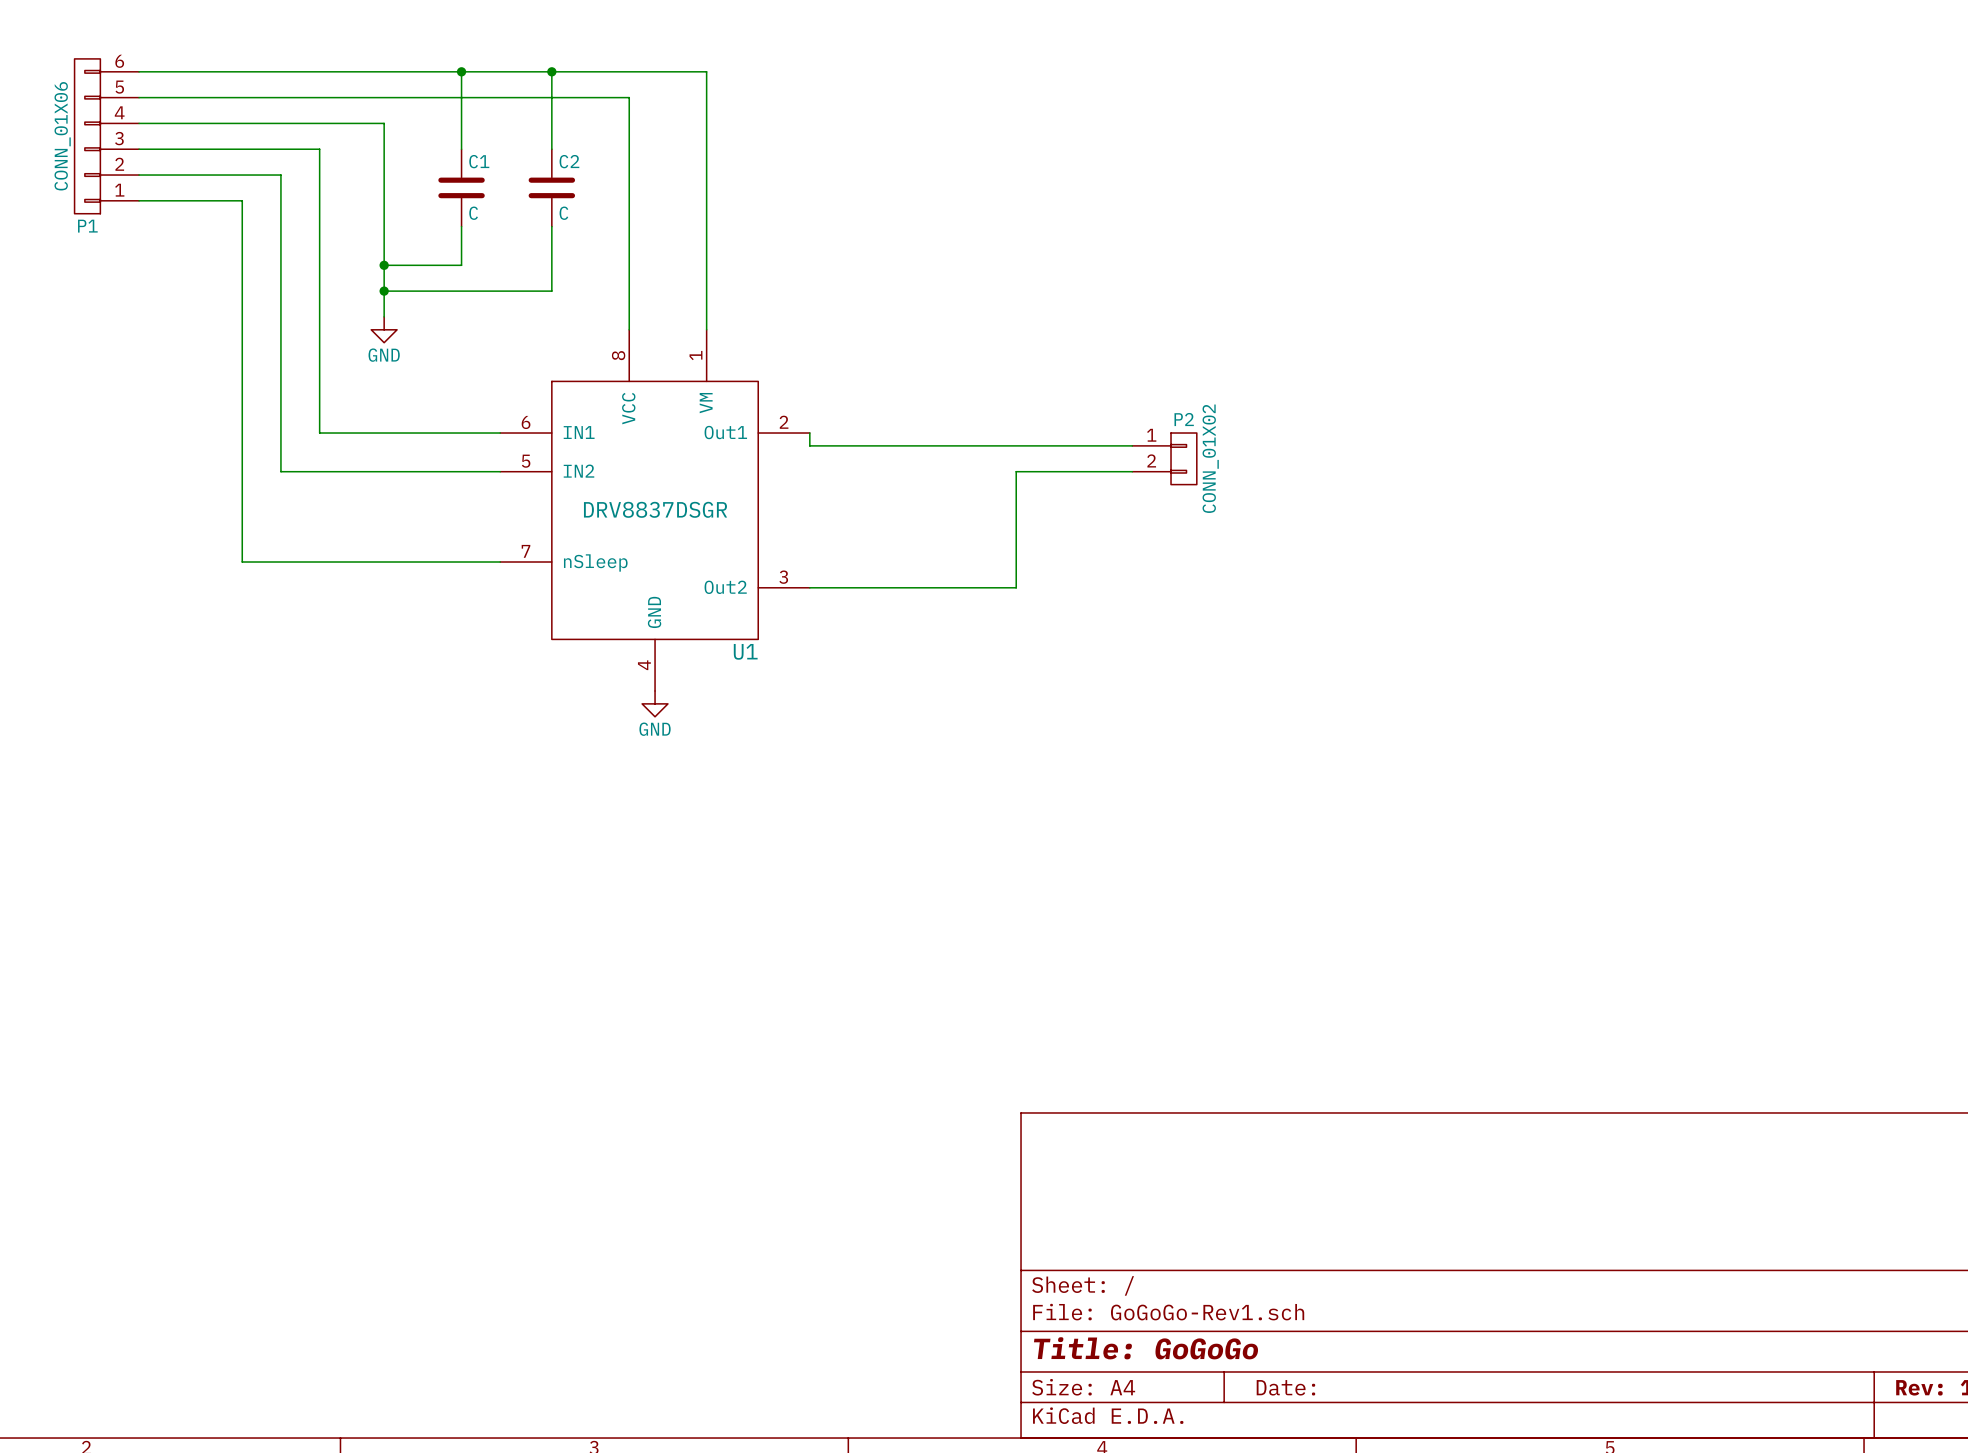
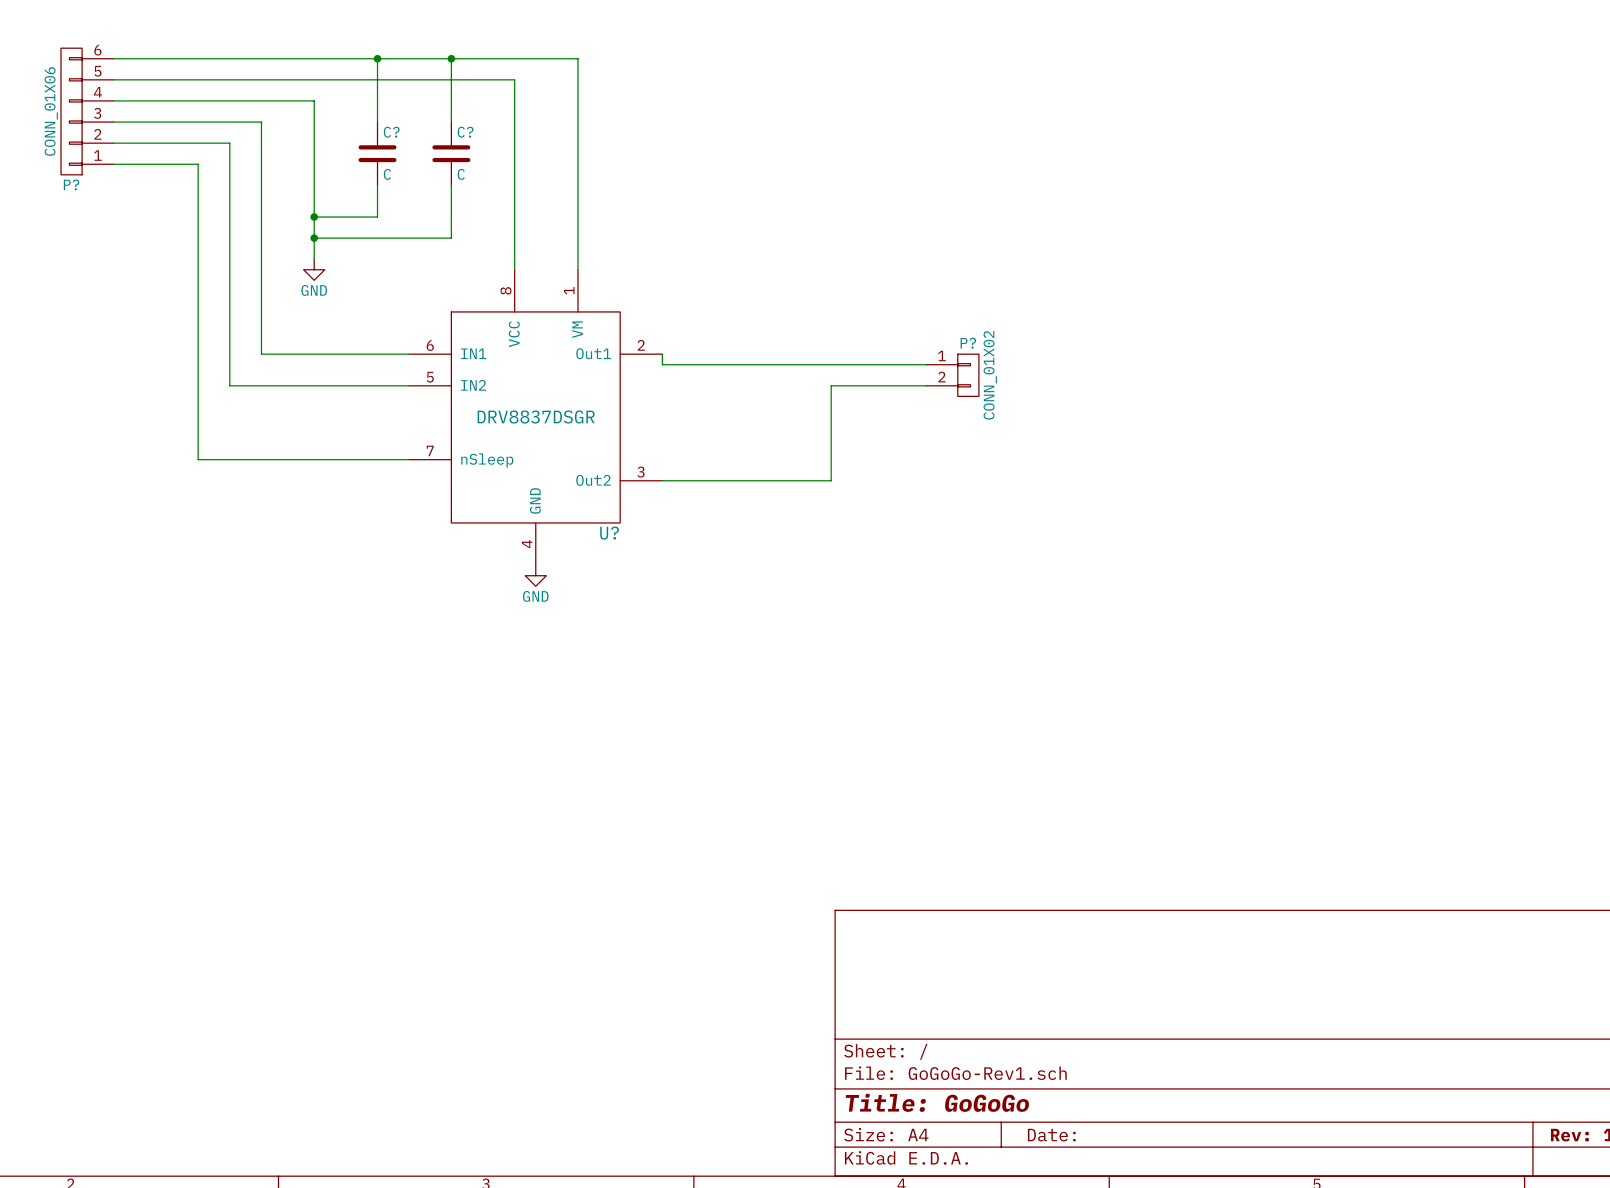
C1 name: C1 (479, 161) -> C? (391, 132)
C2 name: C2 (569, 161) -> C? (465, 132)
P1 name: P1 (87, 226) -> P? (71, 184)
P2 name: P2 (1184, 419) -> P? (968, 343)
U1 name: U1 (745, 651) -> U? (609, 533)

